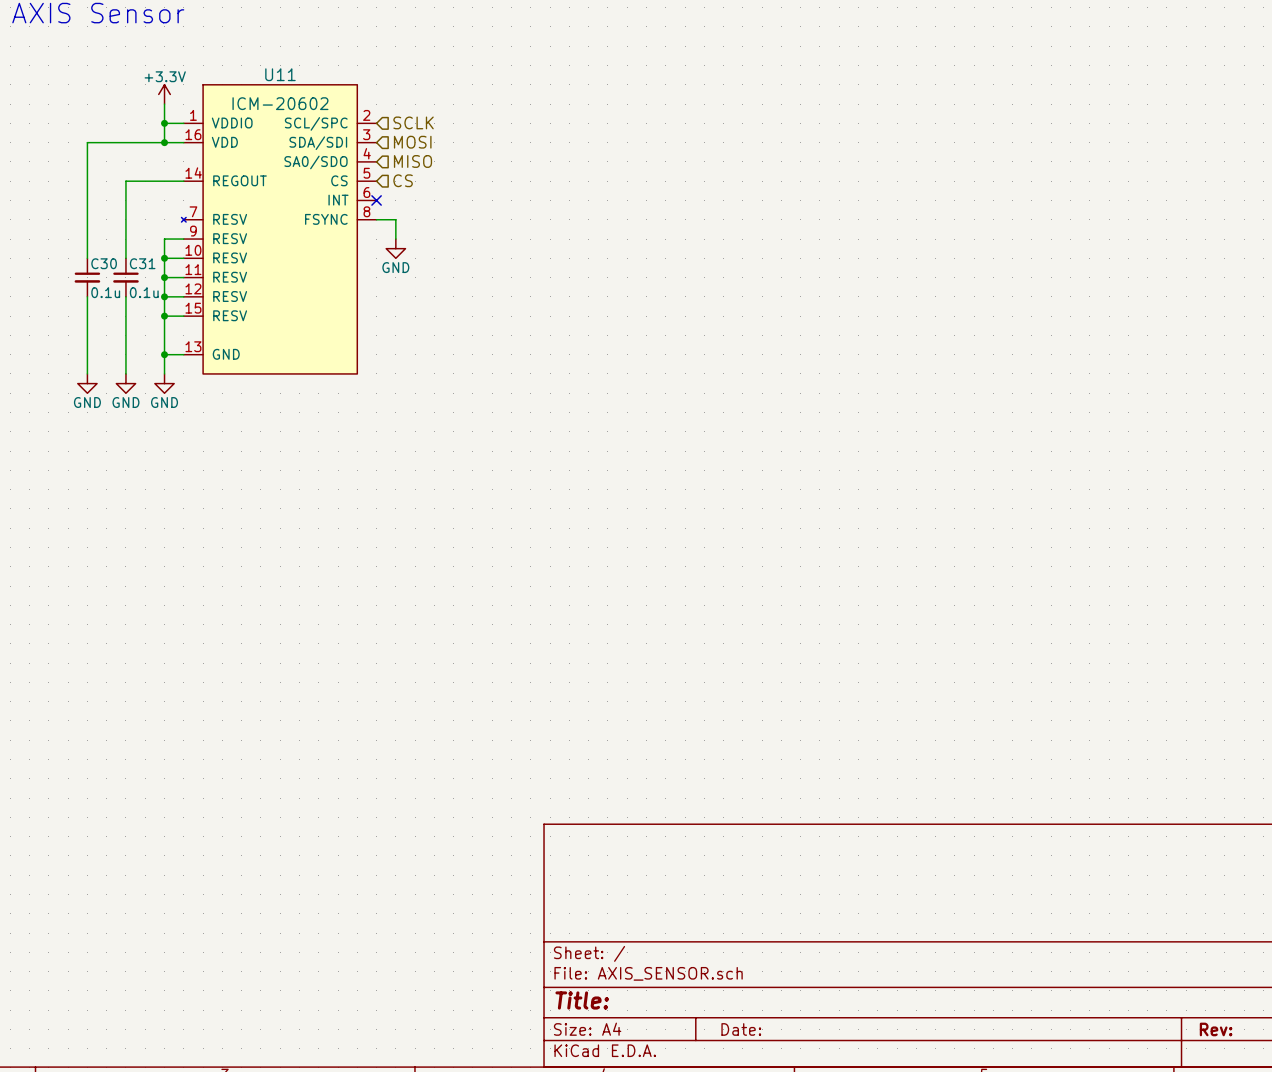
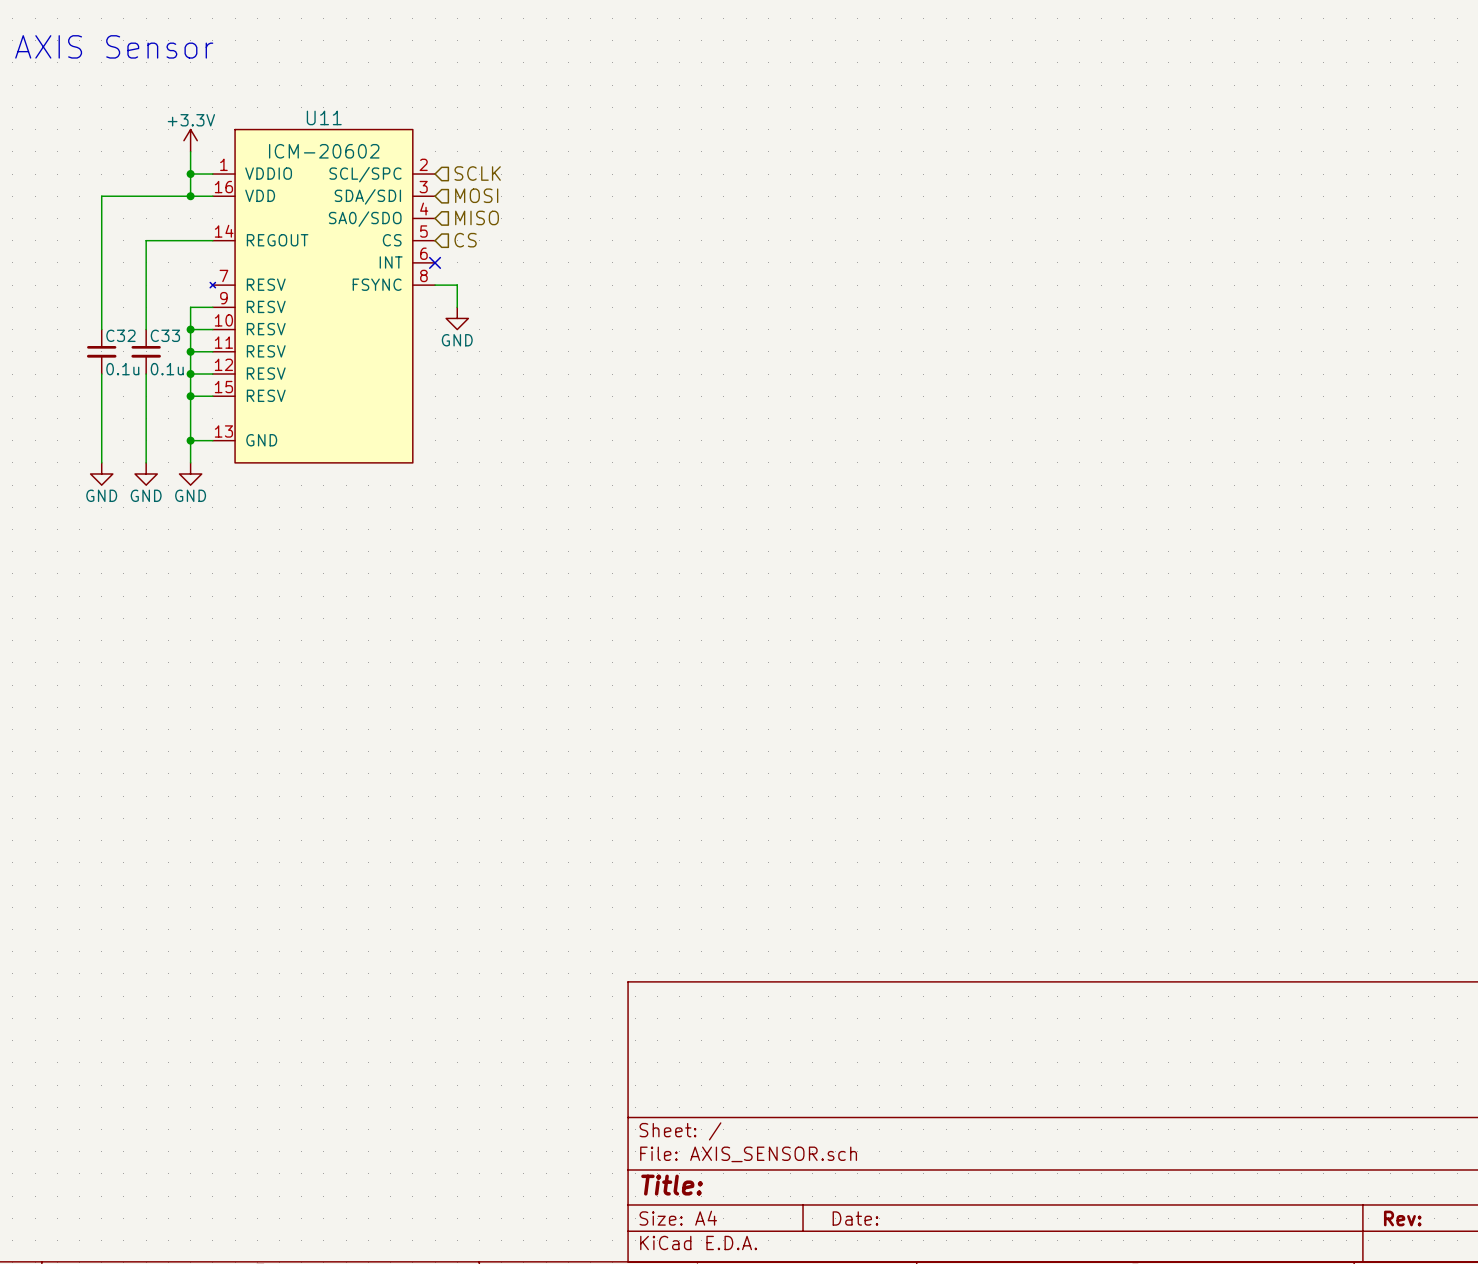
C30 name: C30 (104, 263) -> C32 (120, 335)
C31 name: C31 (142, 263) -> C33 (165, 335)

